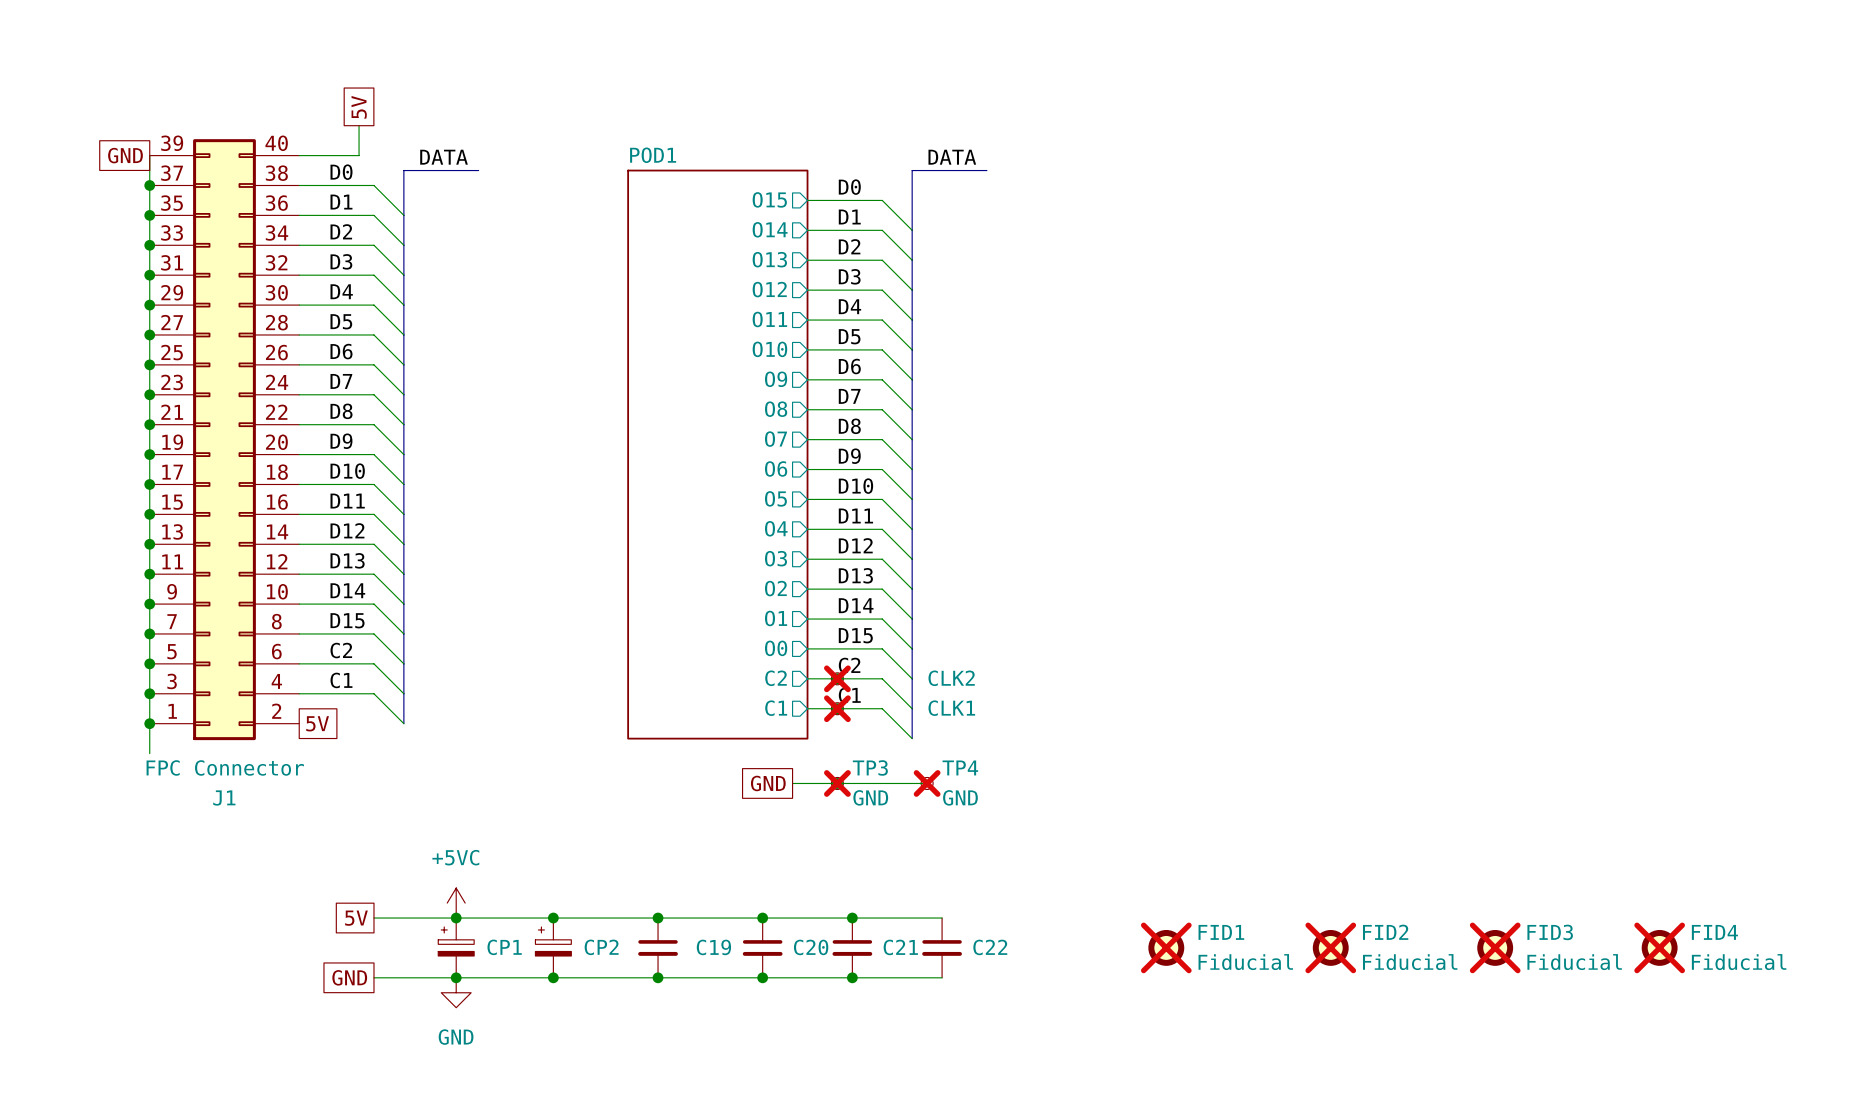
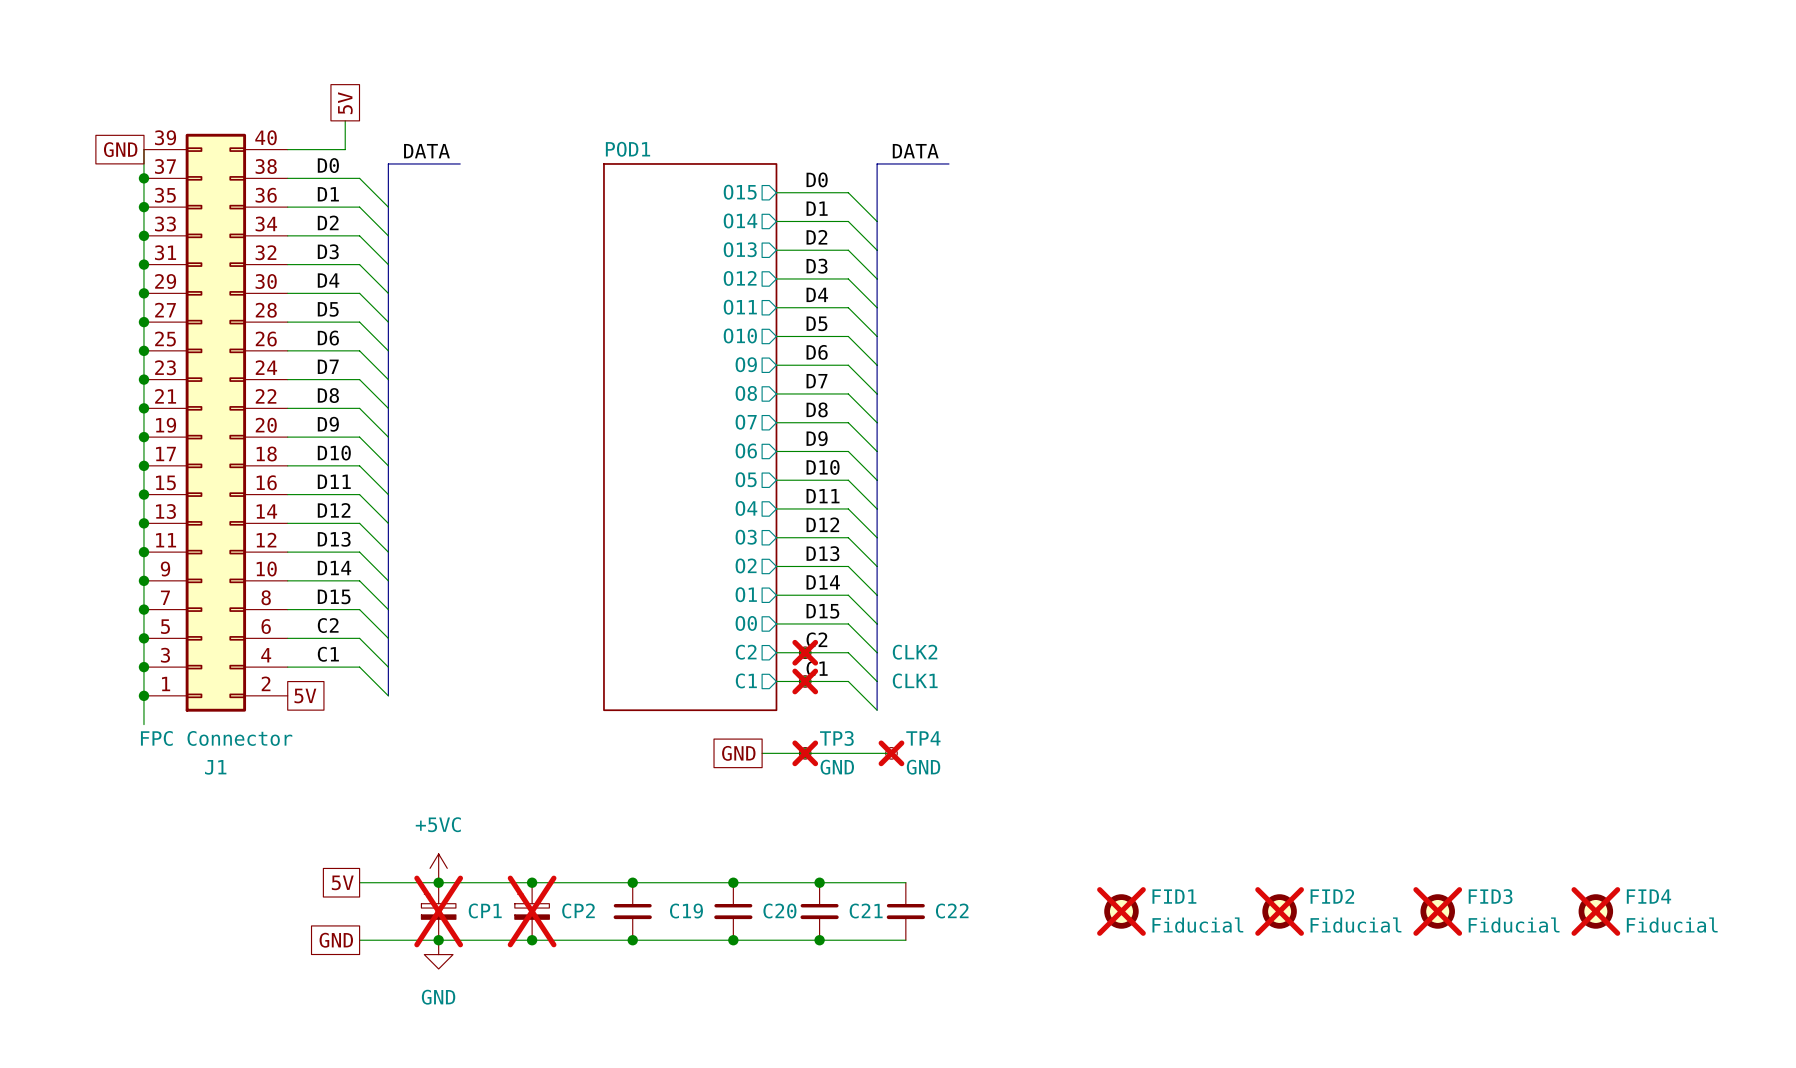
CP1 do-not-place cross: none -> (438, 911)
CP2 do-not-place cross: none -> (532, 911)

